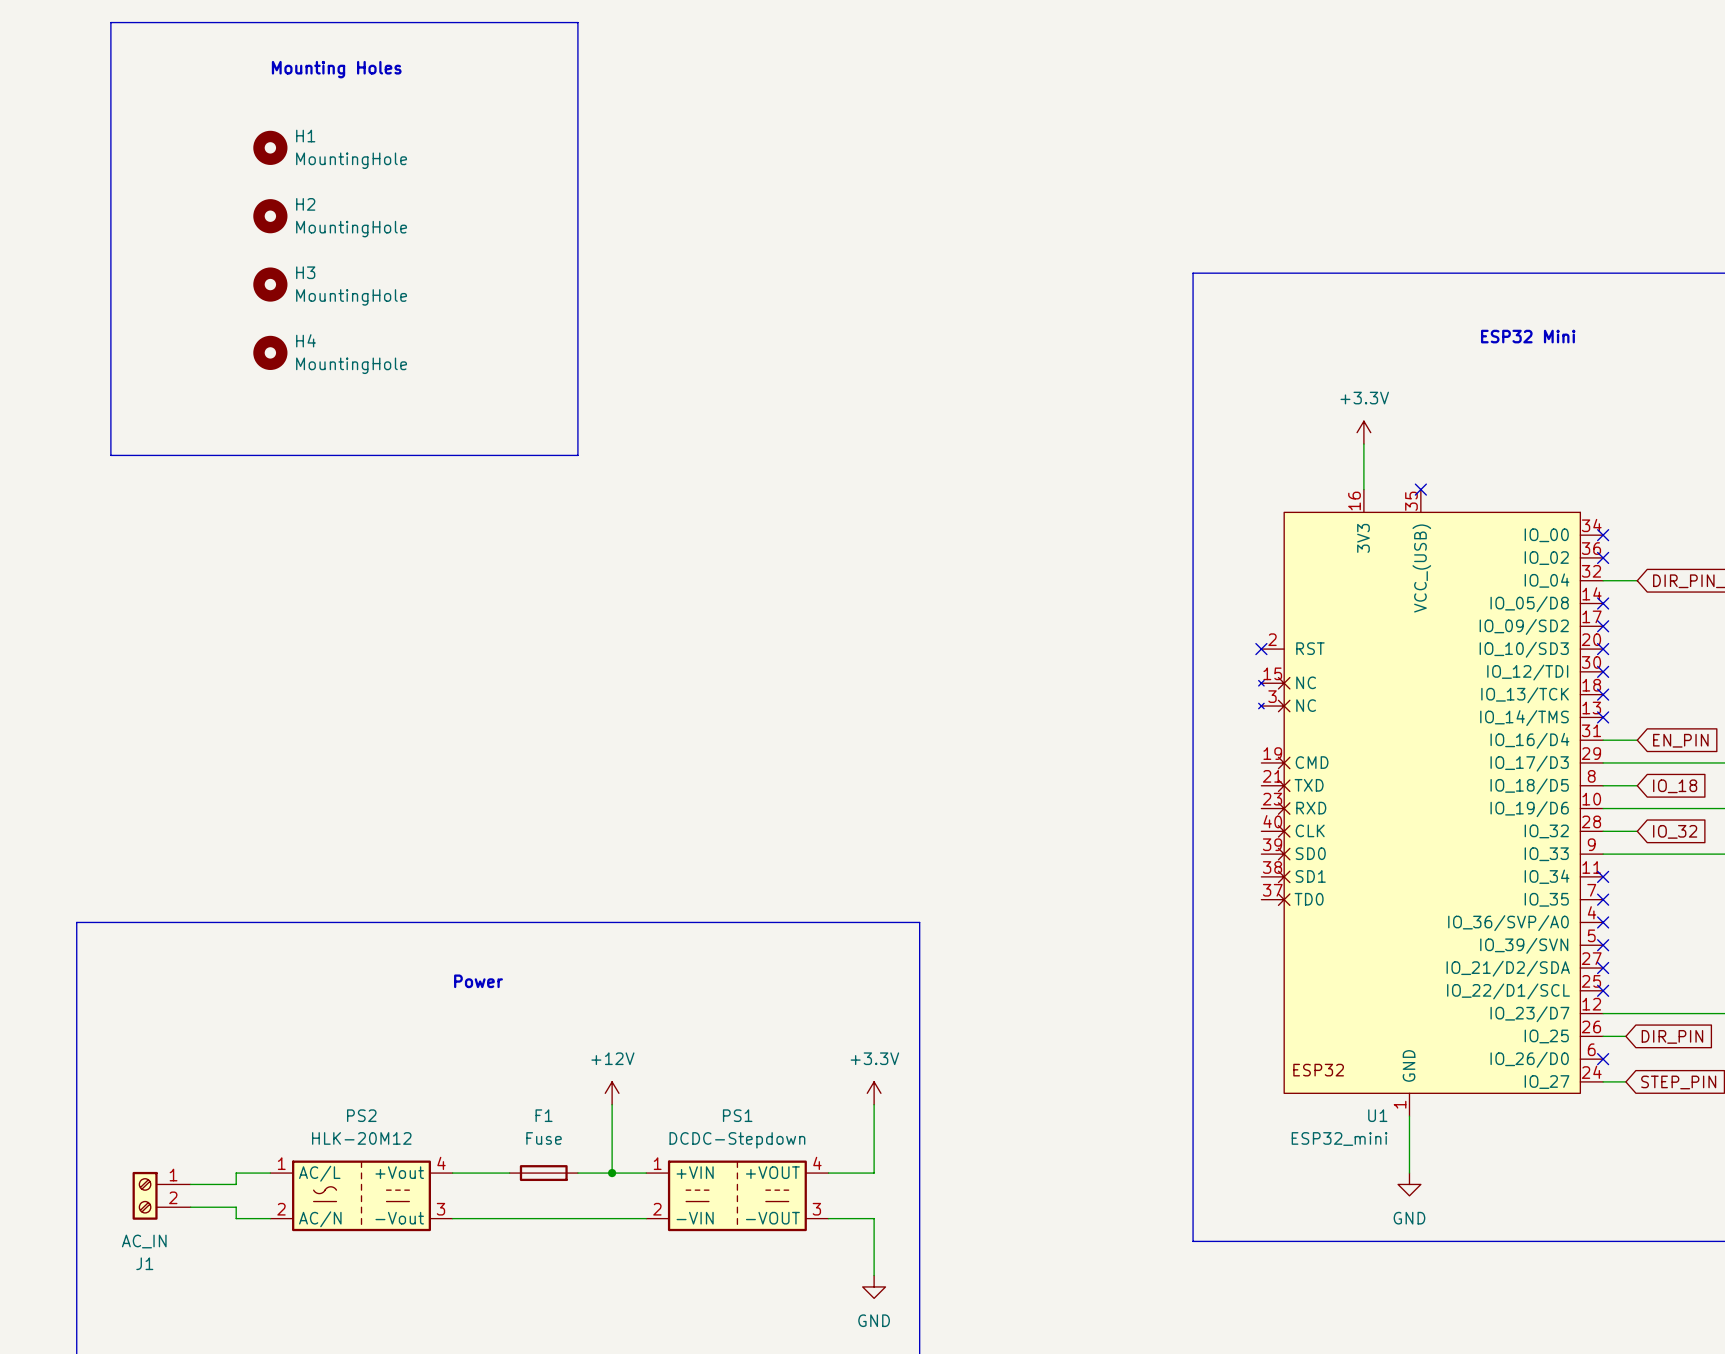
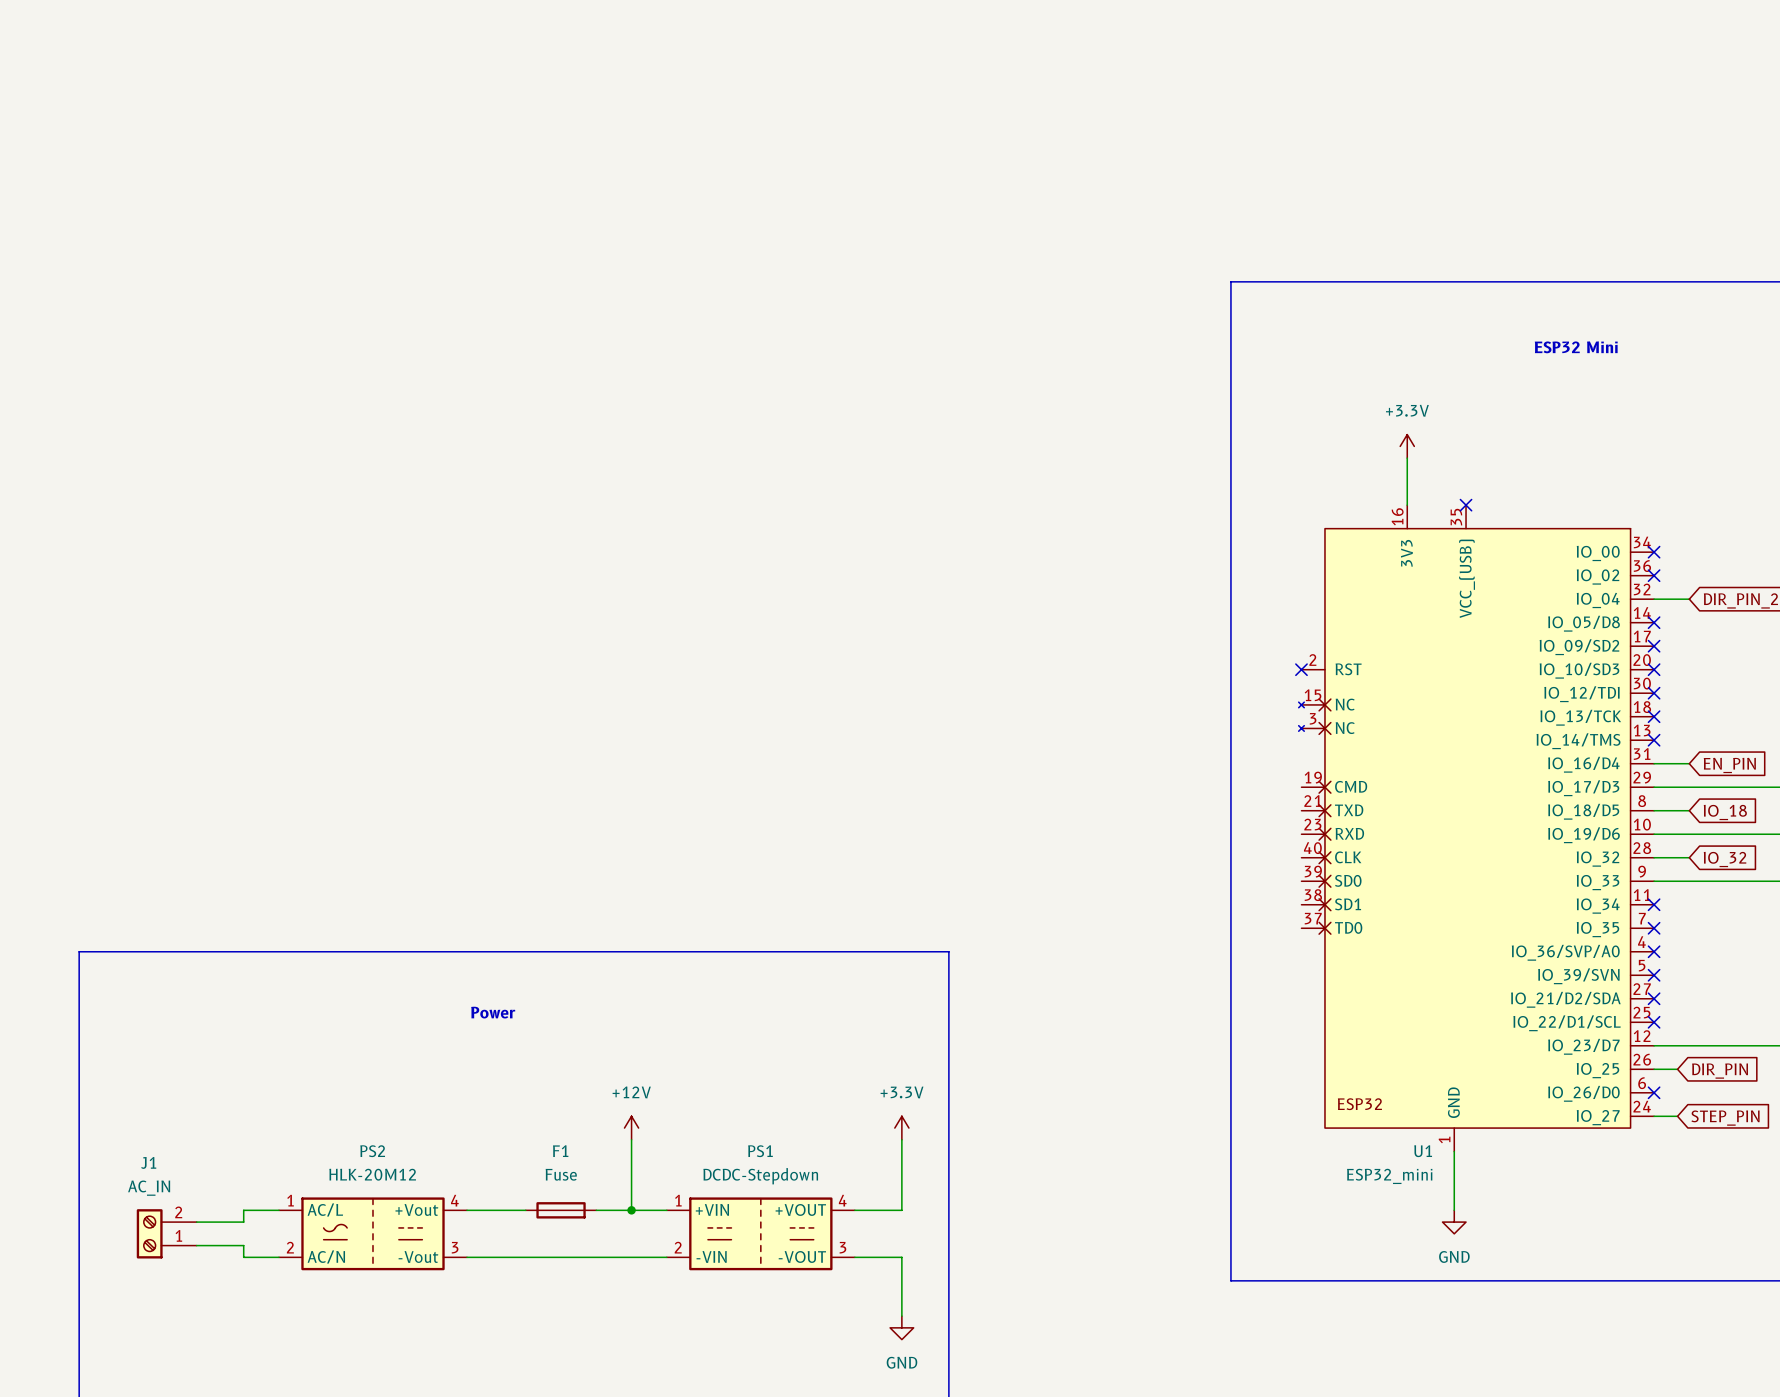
line: (110, 22) (110, 455) (577, 455) (577, 22) (110, 22) -> none
text: Mounting Holes (336, 69) -> none
H1: MountingHole (270, 147) -> none
H2: MountingHole (270, 216) -> none
H3: MountingHole (270, 284) -> none
H4: MountingHole (270, 352) -> none
J1 flip: as is (145, 1195) -> up-down (149, 1233)

